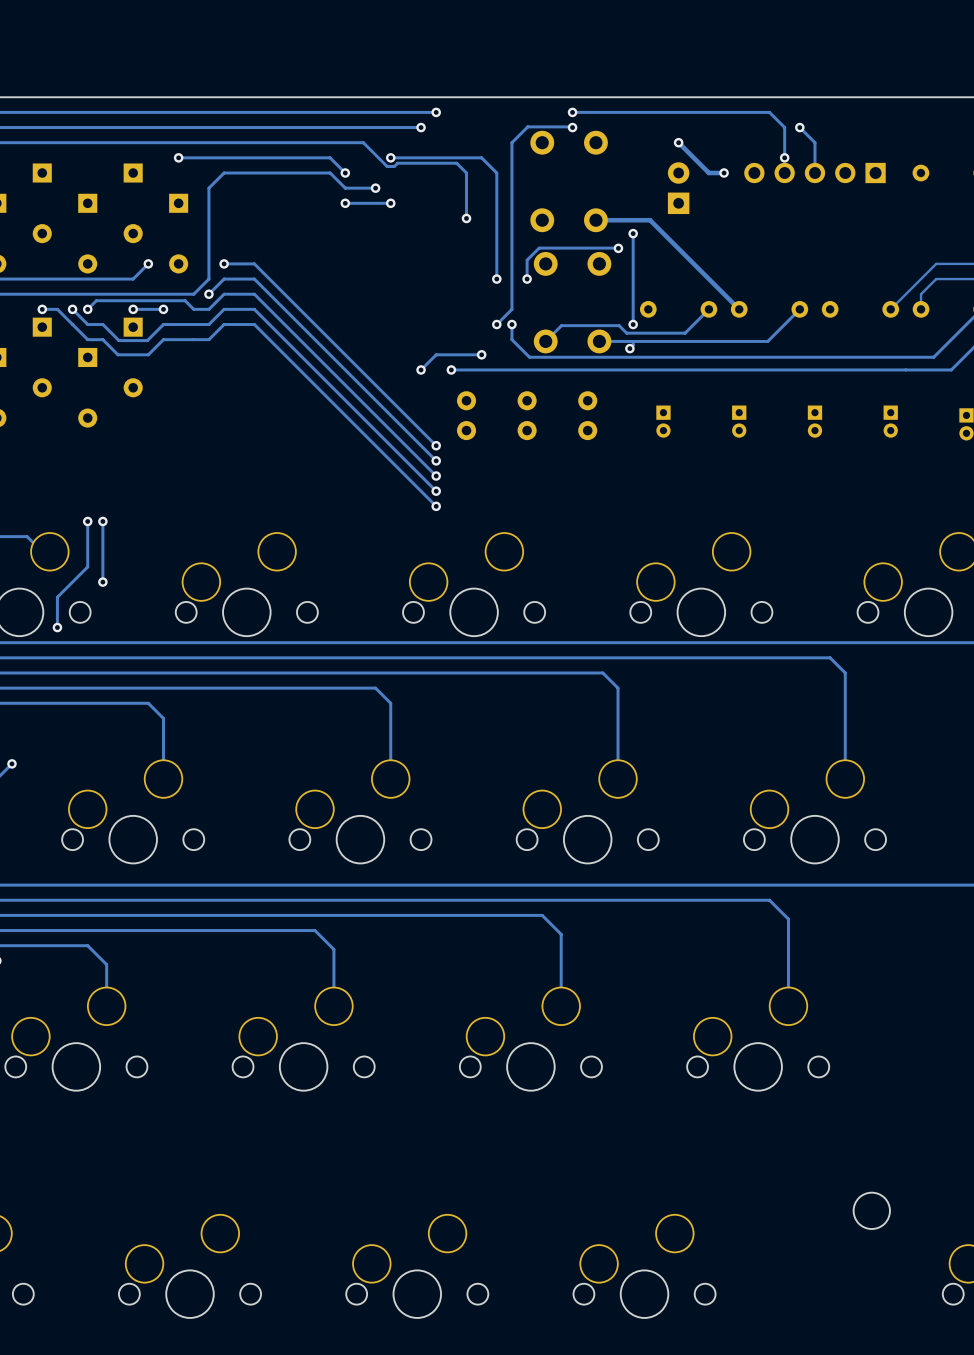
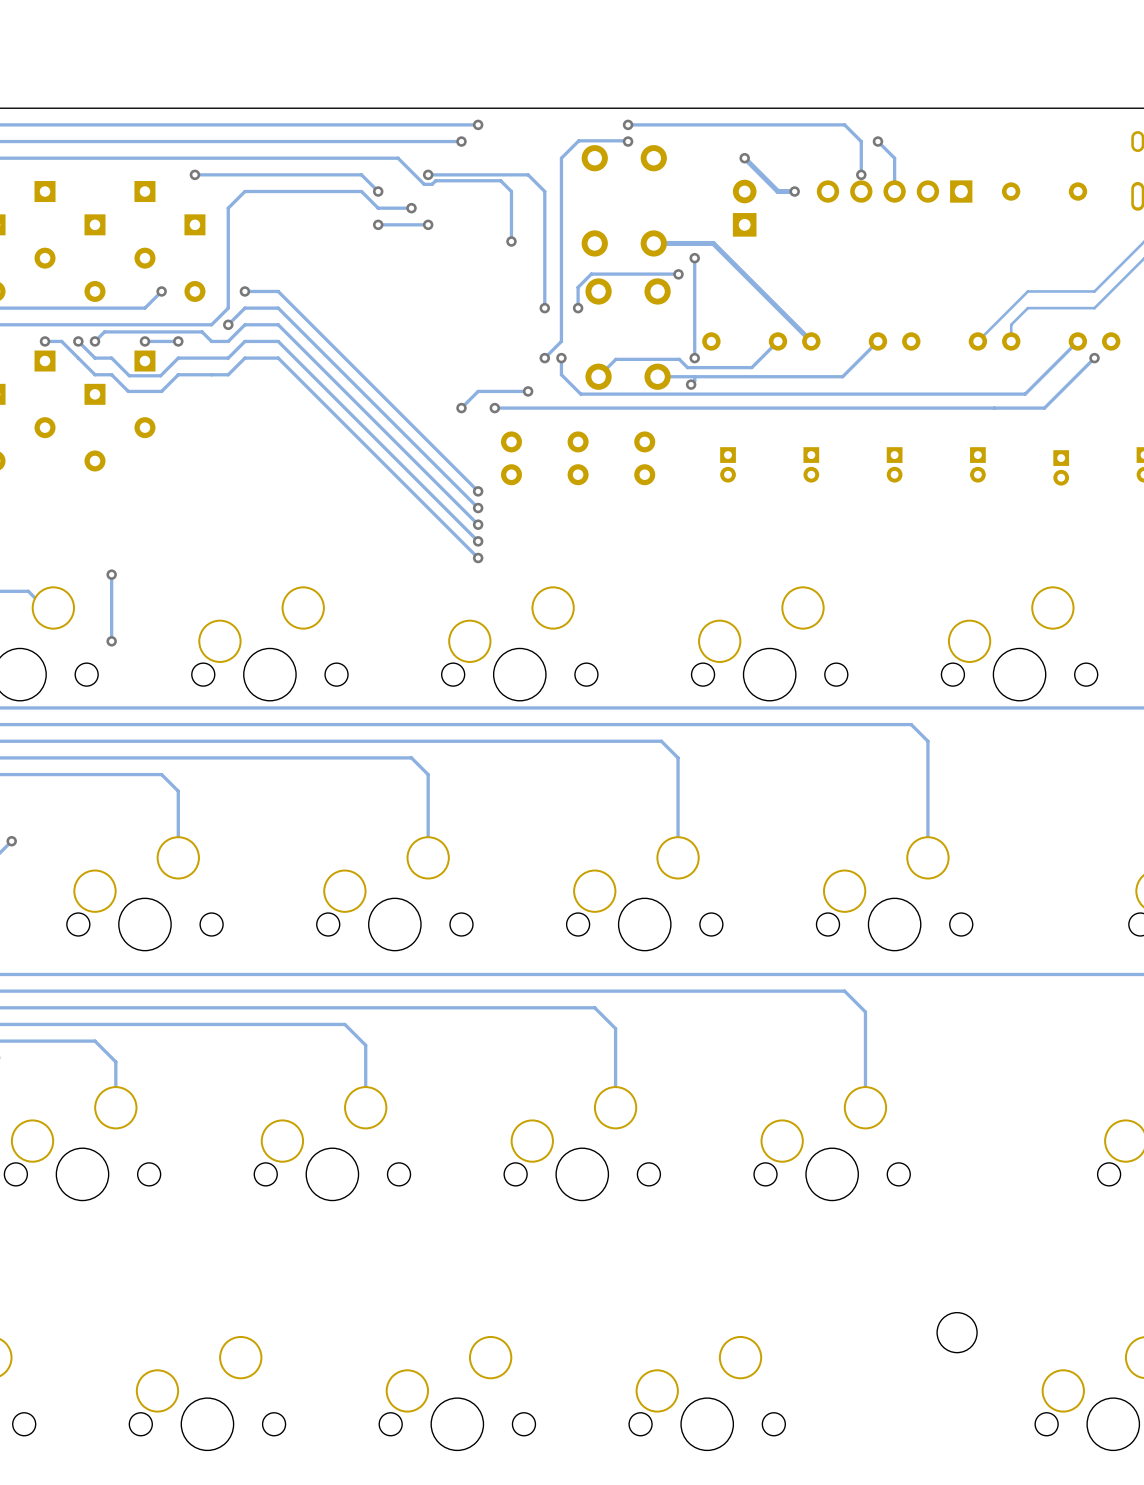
track: (87, 521) (87, 566) (57, 597) (57, 627) -> none
via: (87, 521) -> none
via: (57, 627) -> none

